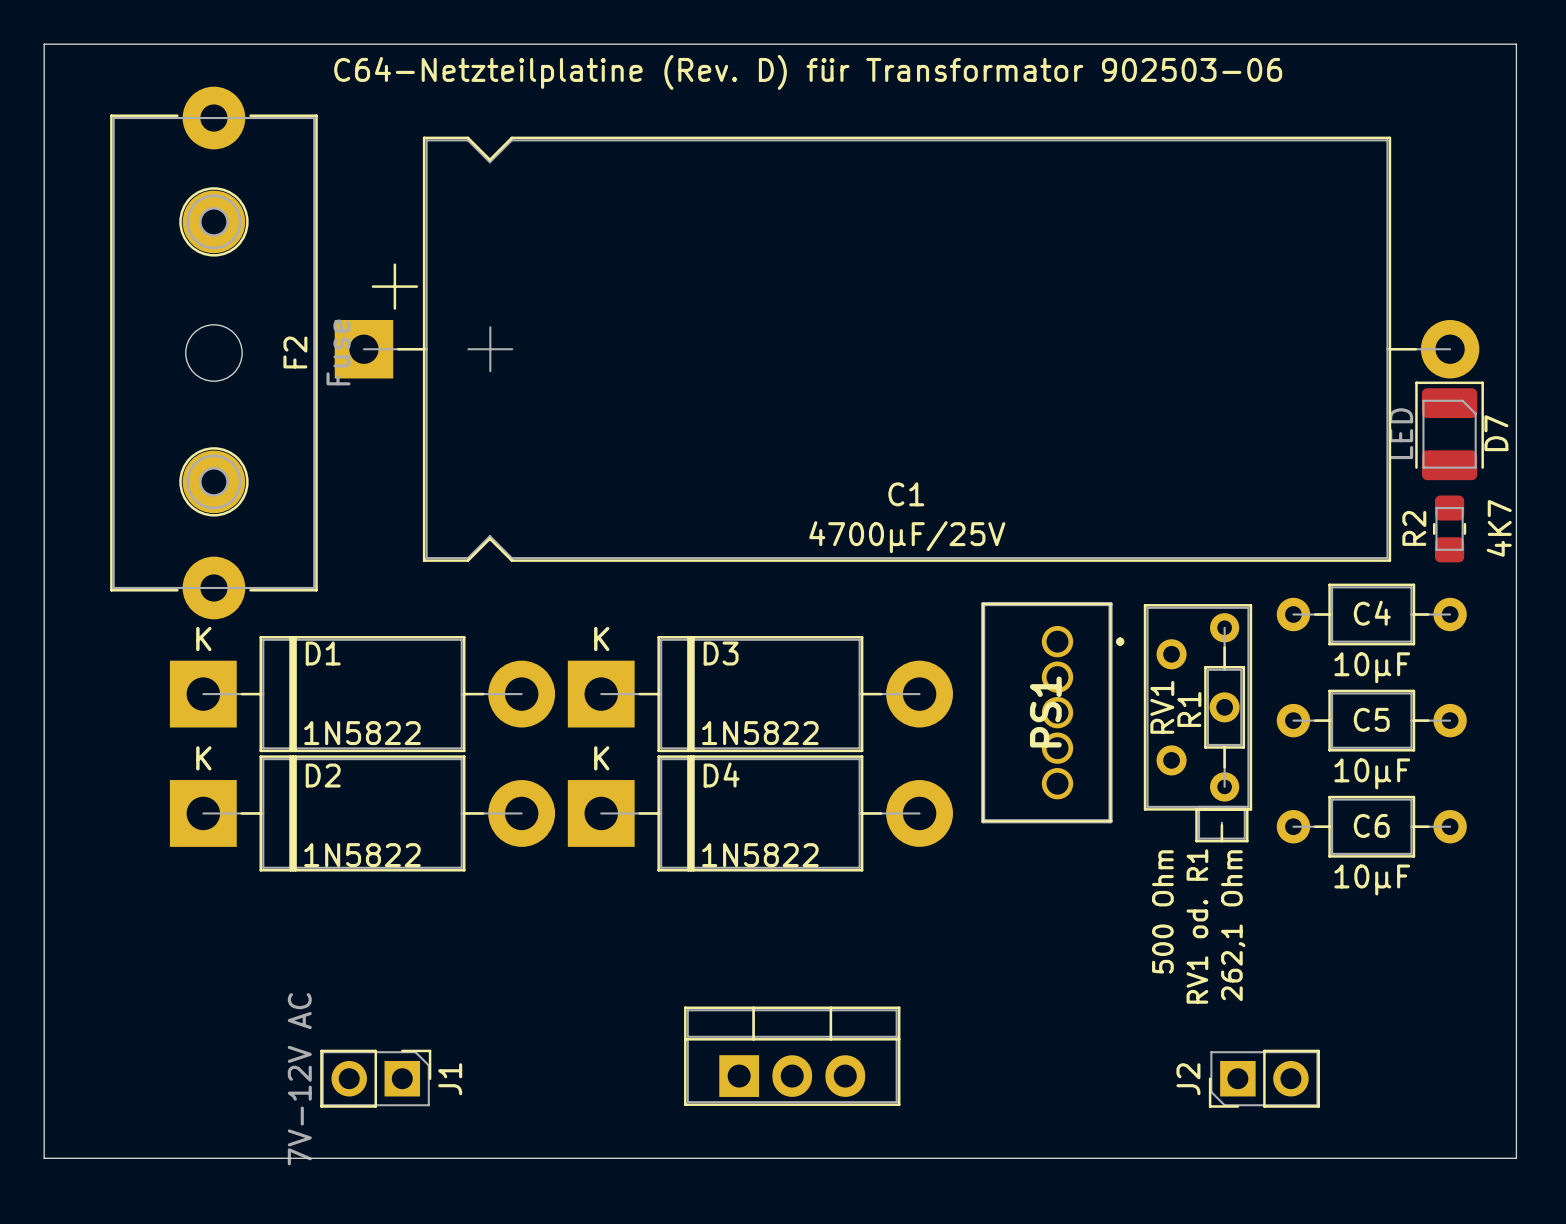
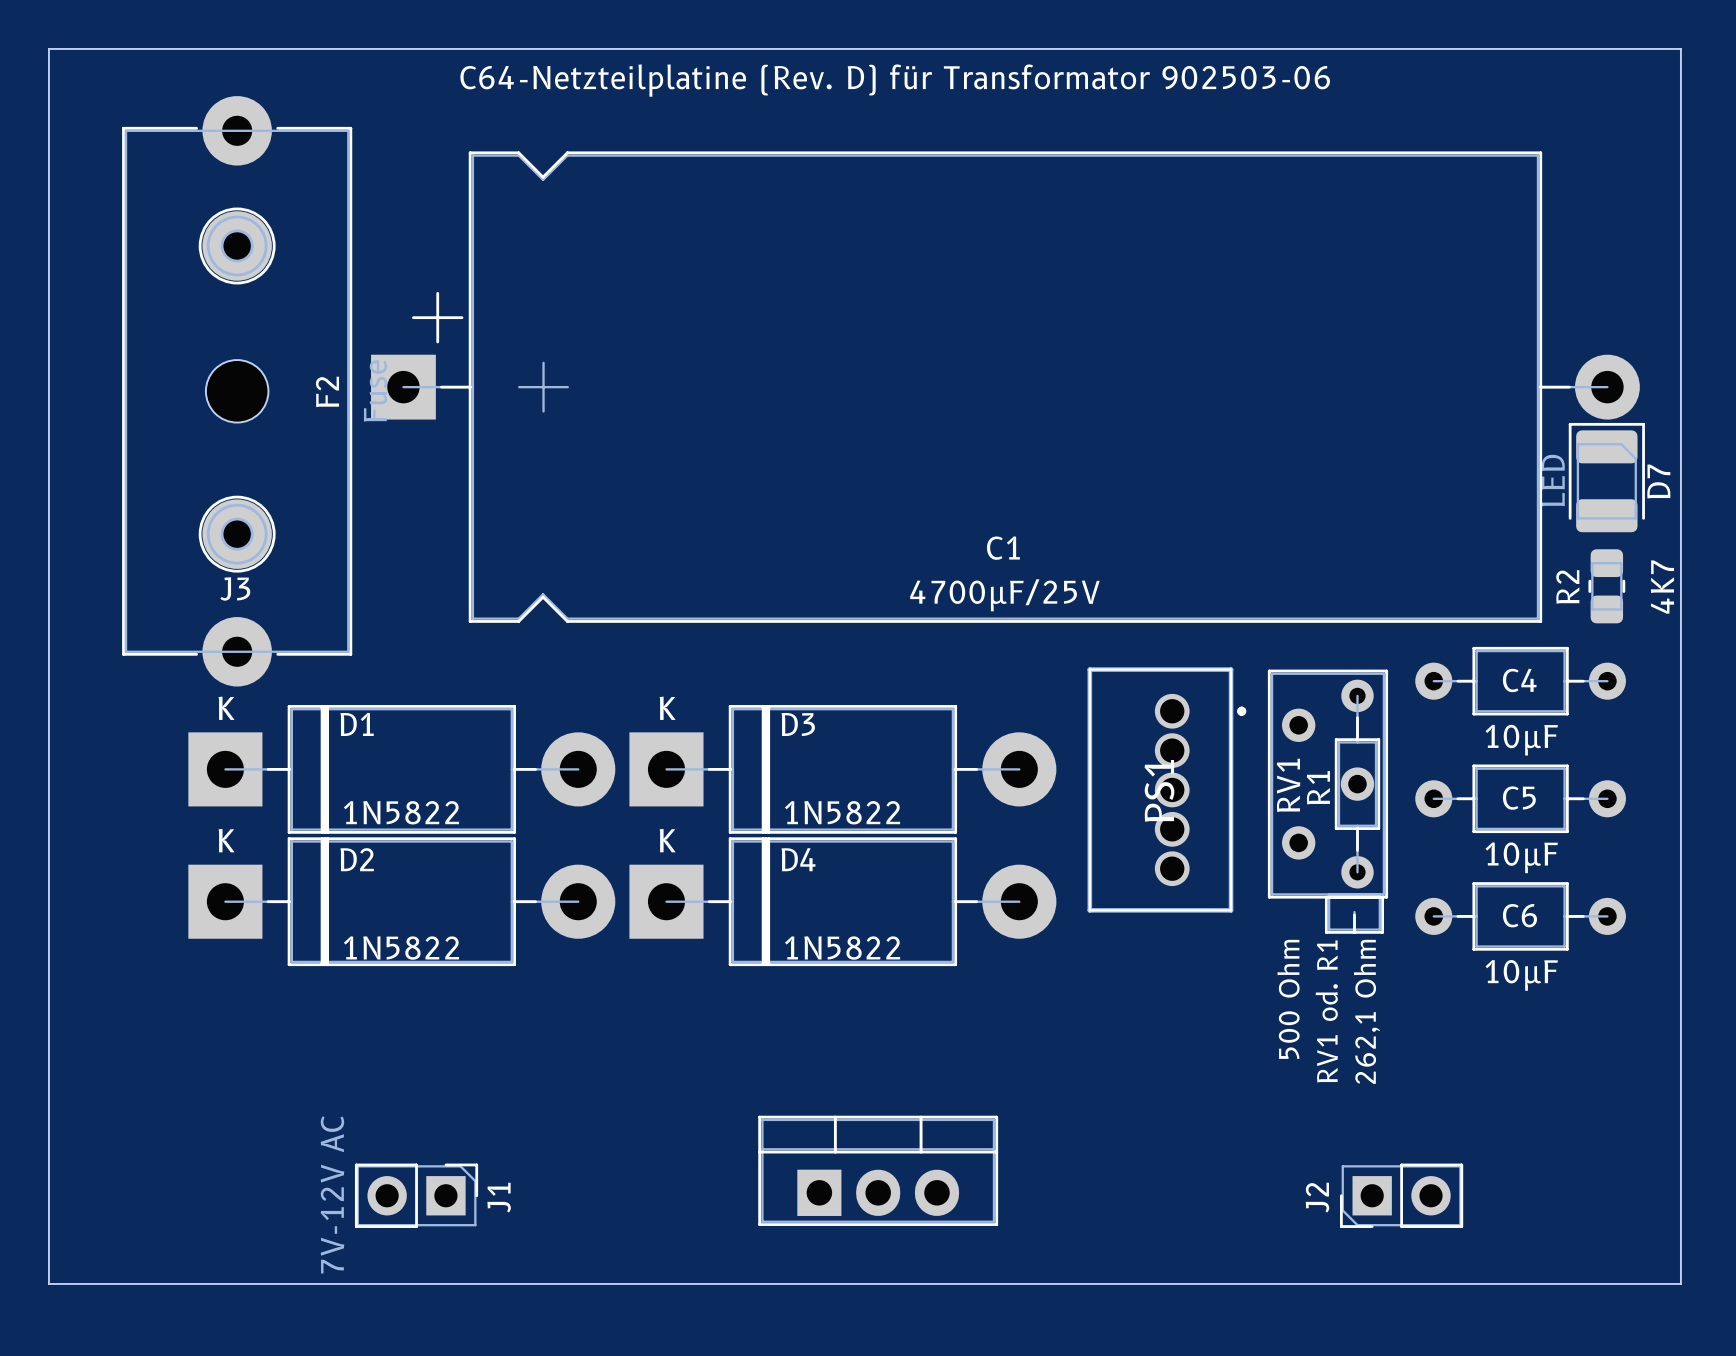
J3 name: none -> J3 (235, 588)

